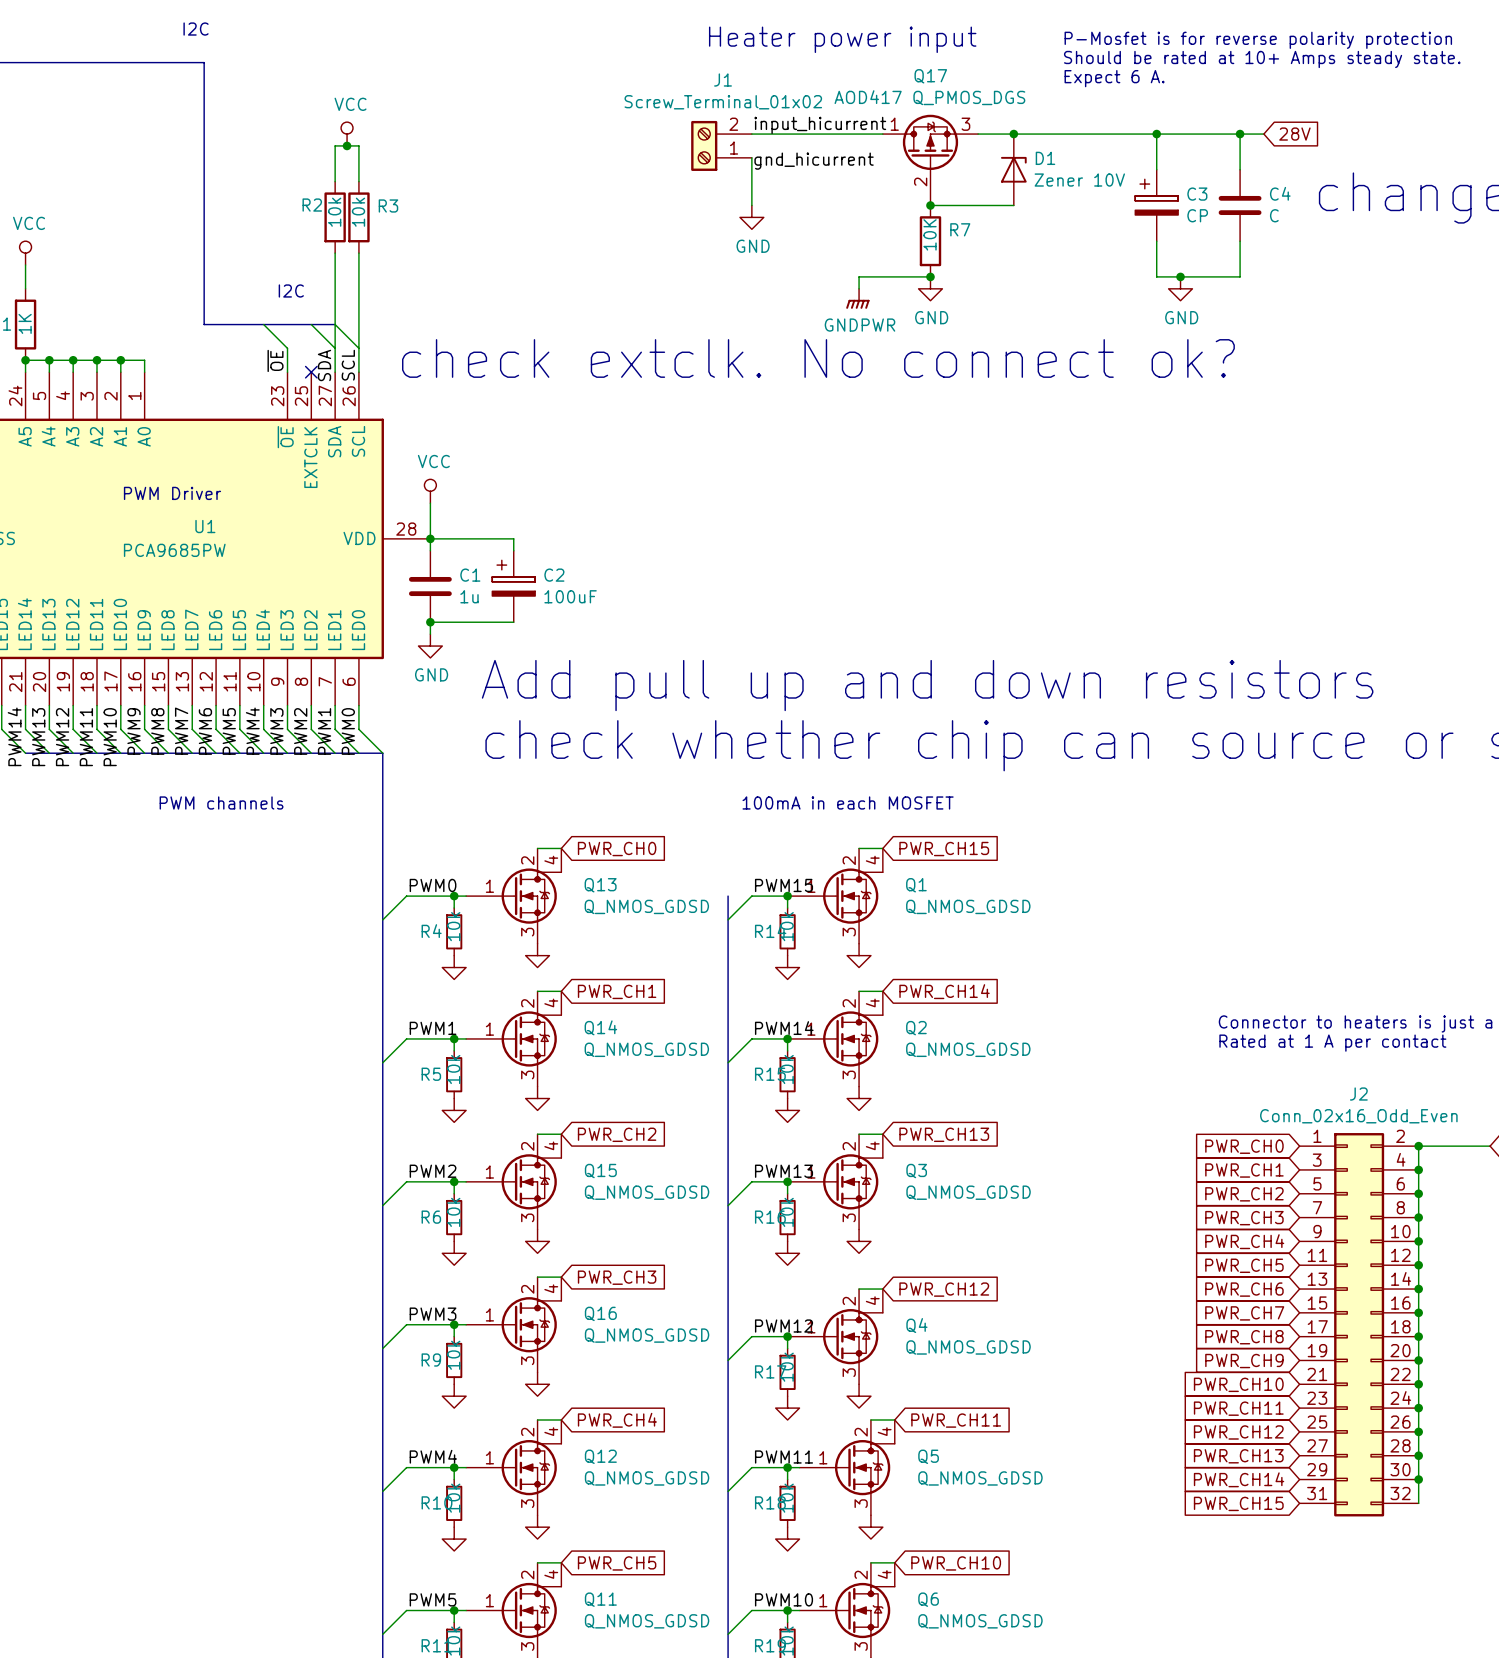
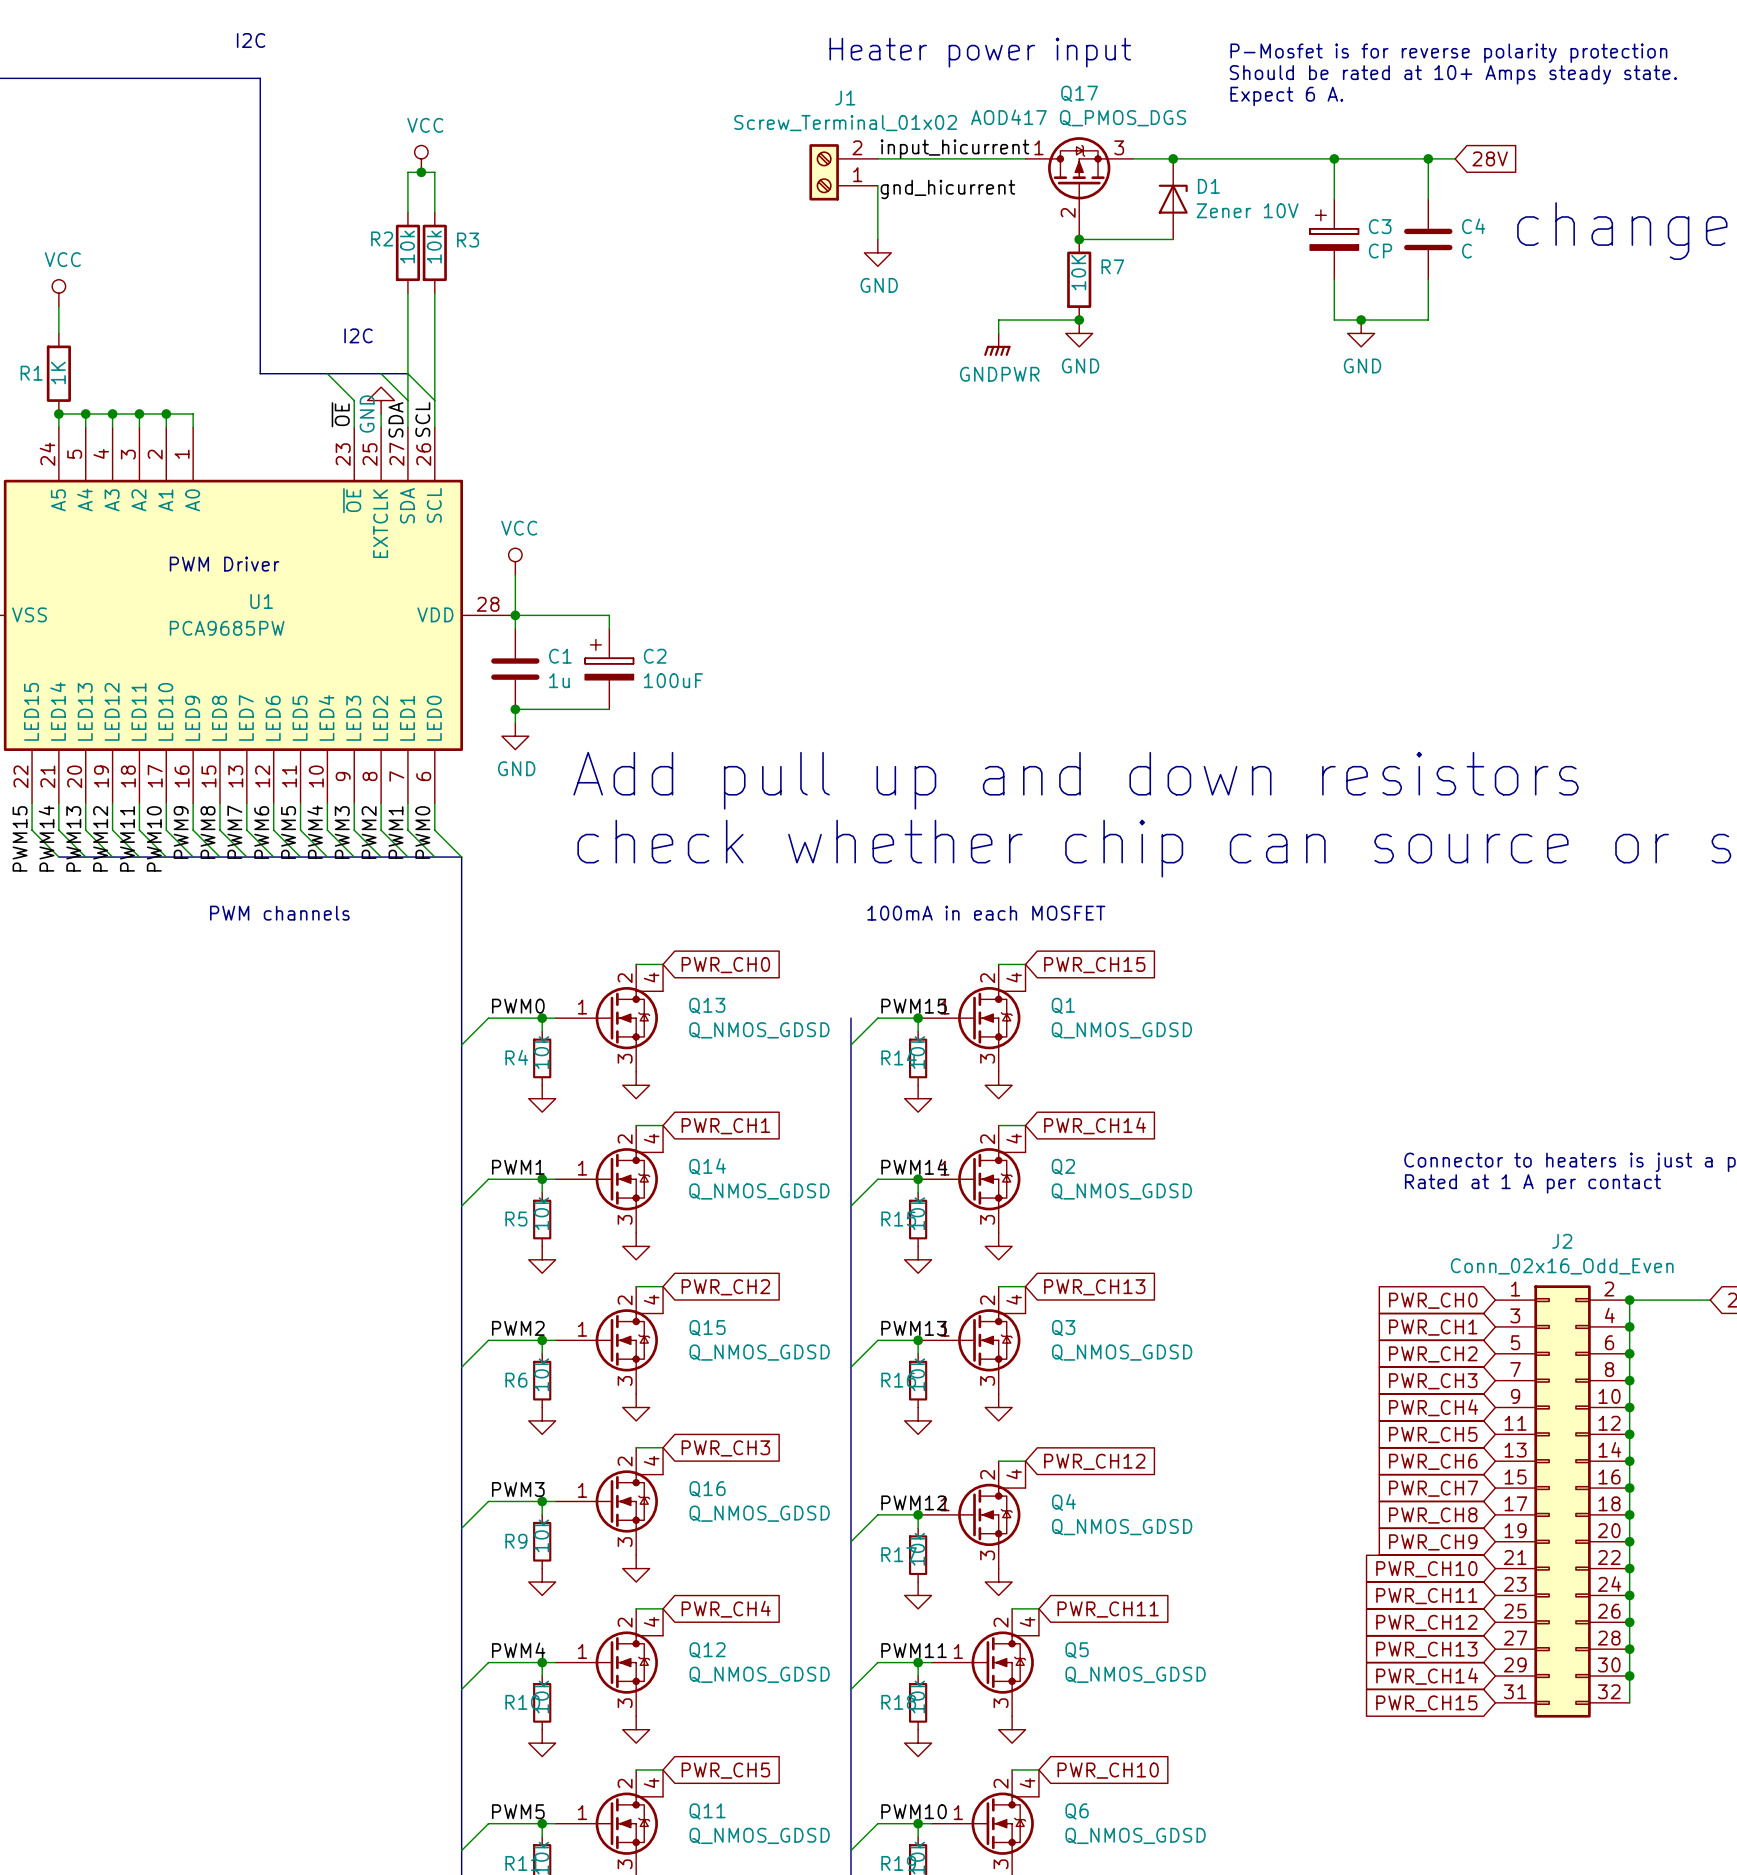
power symbol: none -> GND (381, 400)
text: check extclk. No connect ok? (818, 358) -> none
wire: none -> (381, 413) (381, 427)
no-connect mark: (311, 372) -> none

